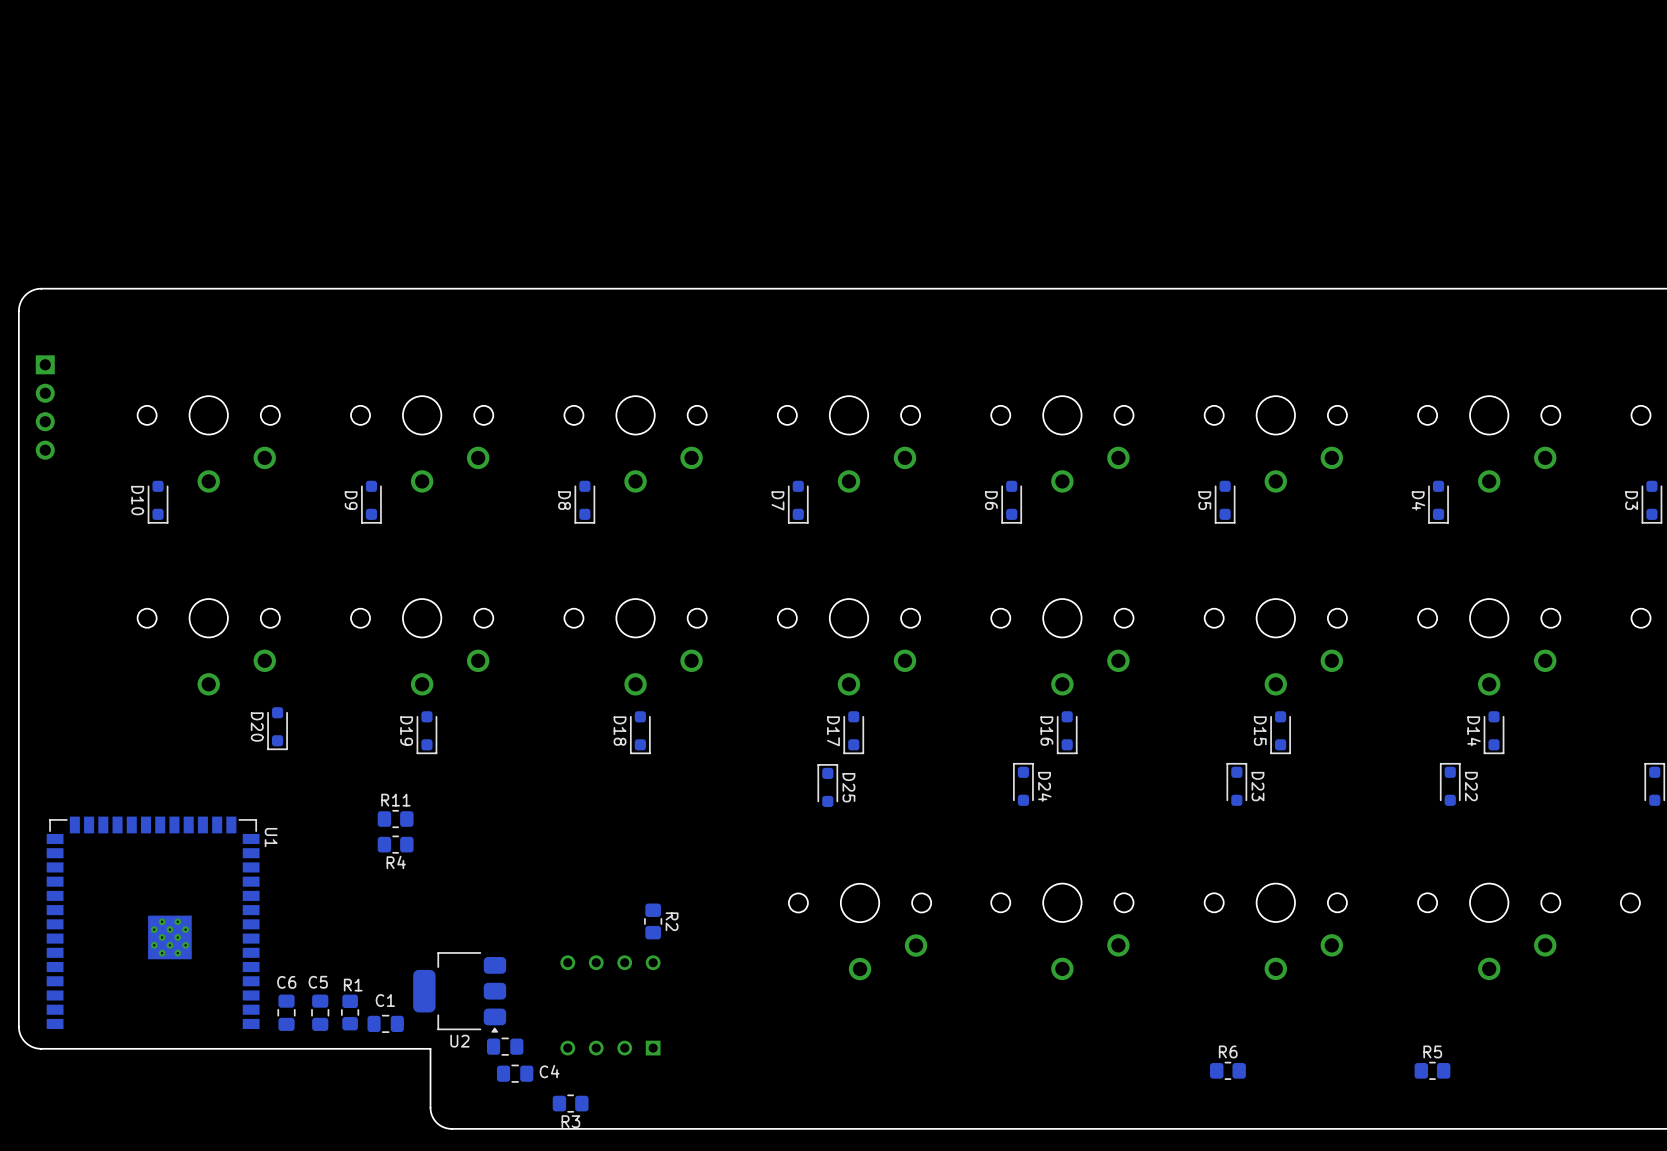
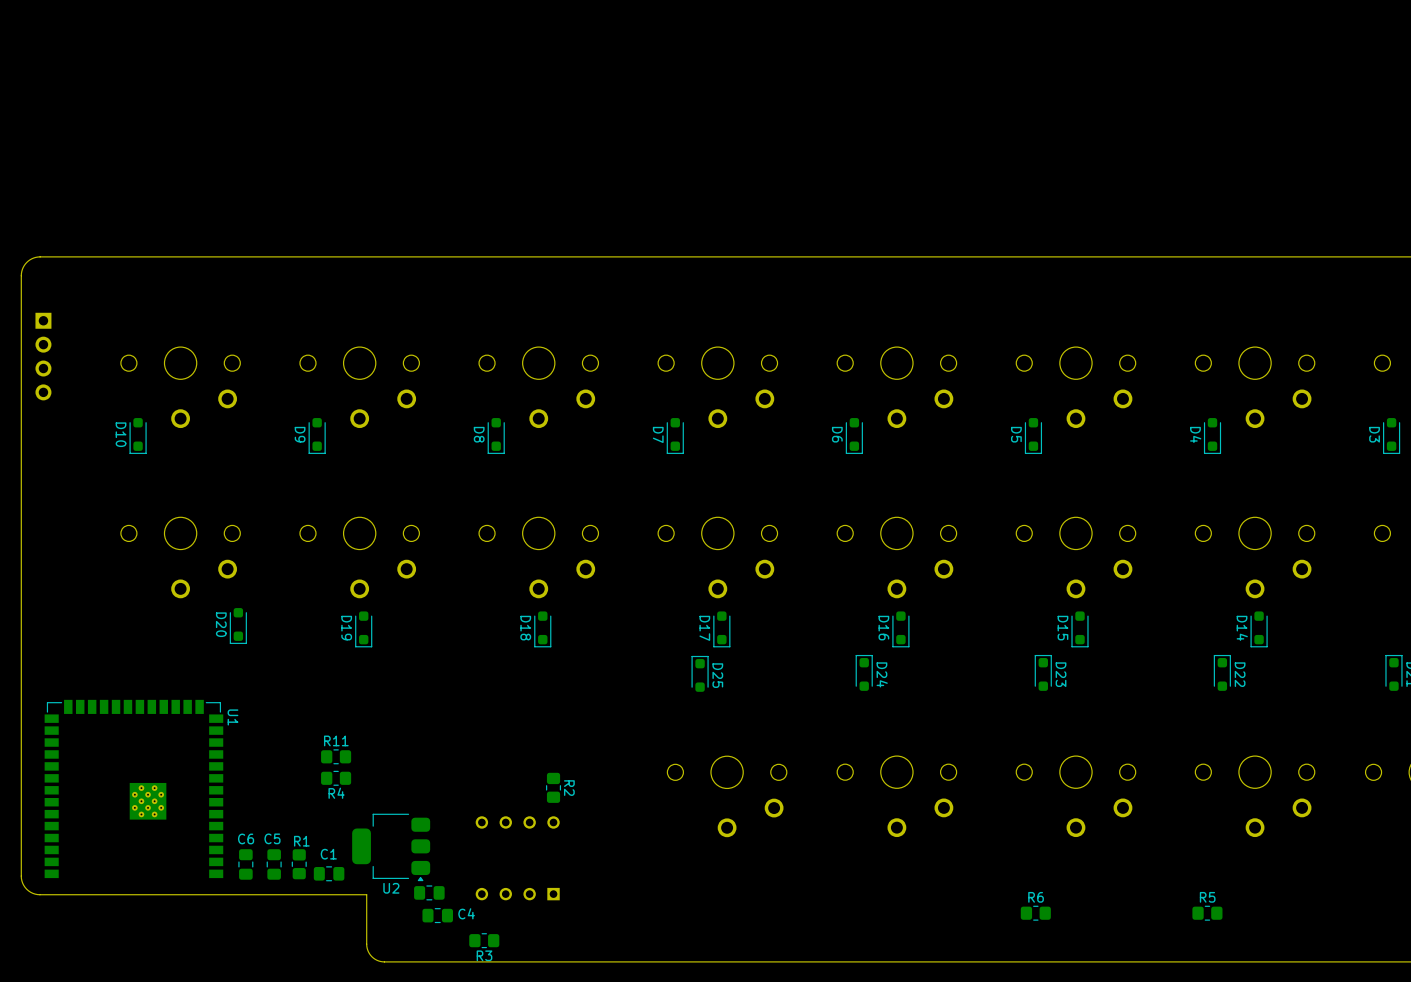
R11 position: (395, 819) -> (336, 756)
R4 position: (395, 844) -> (336, 778)

